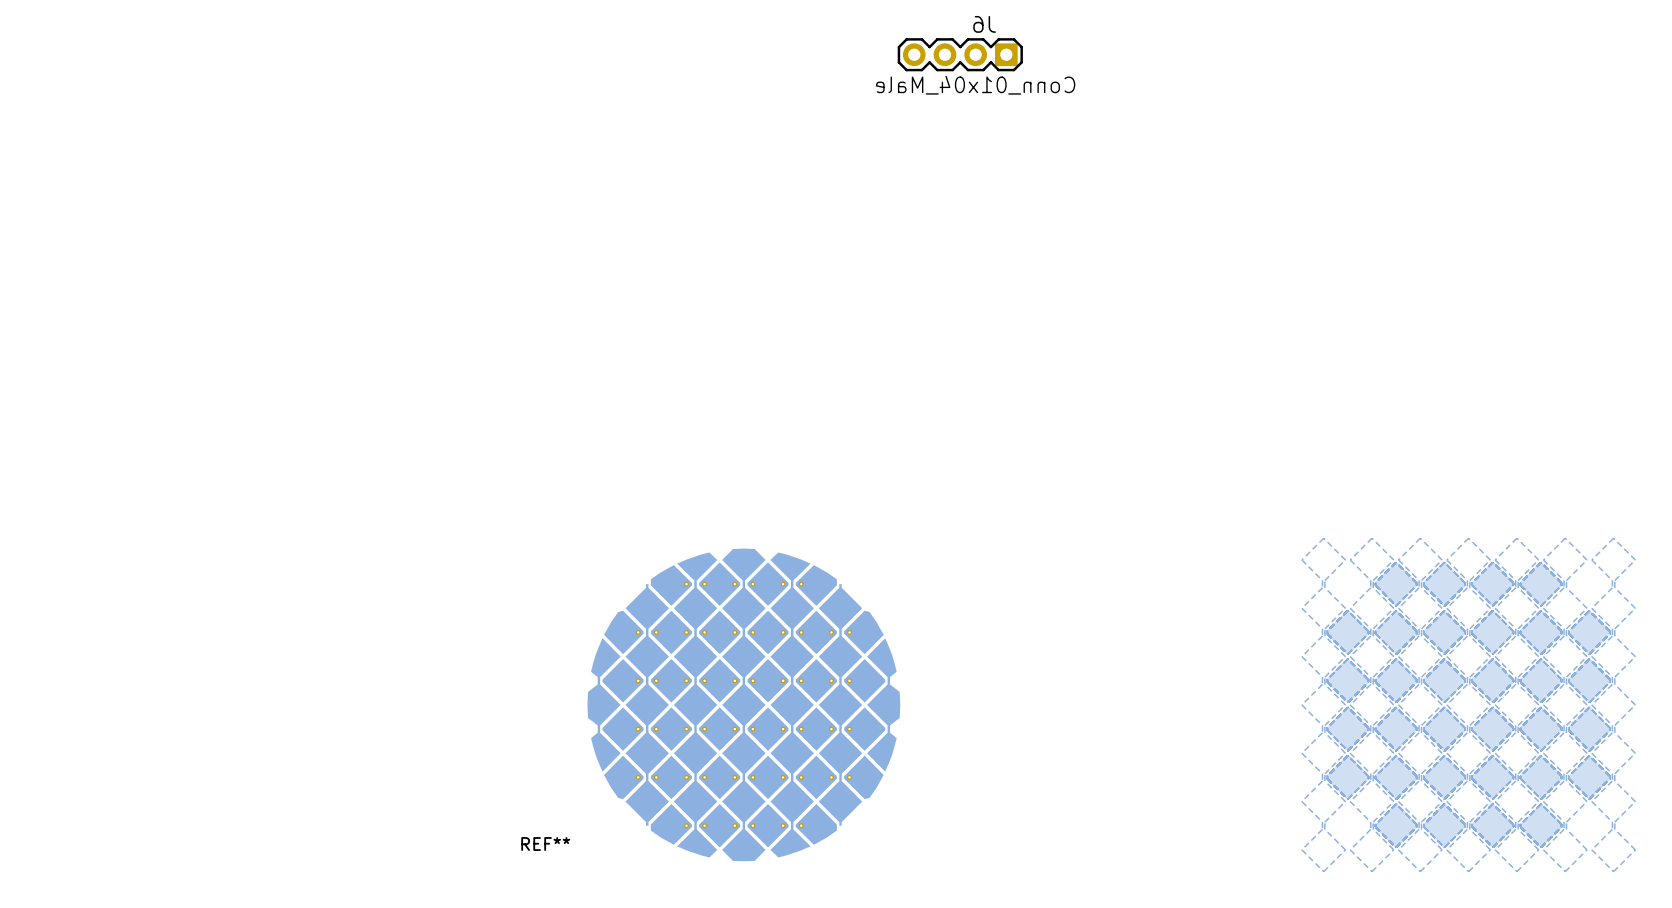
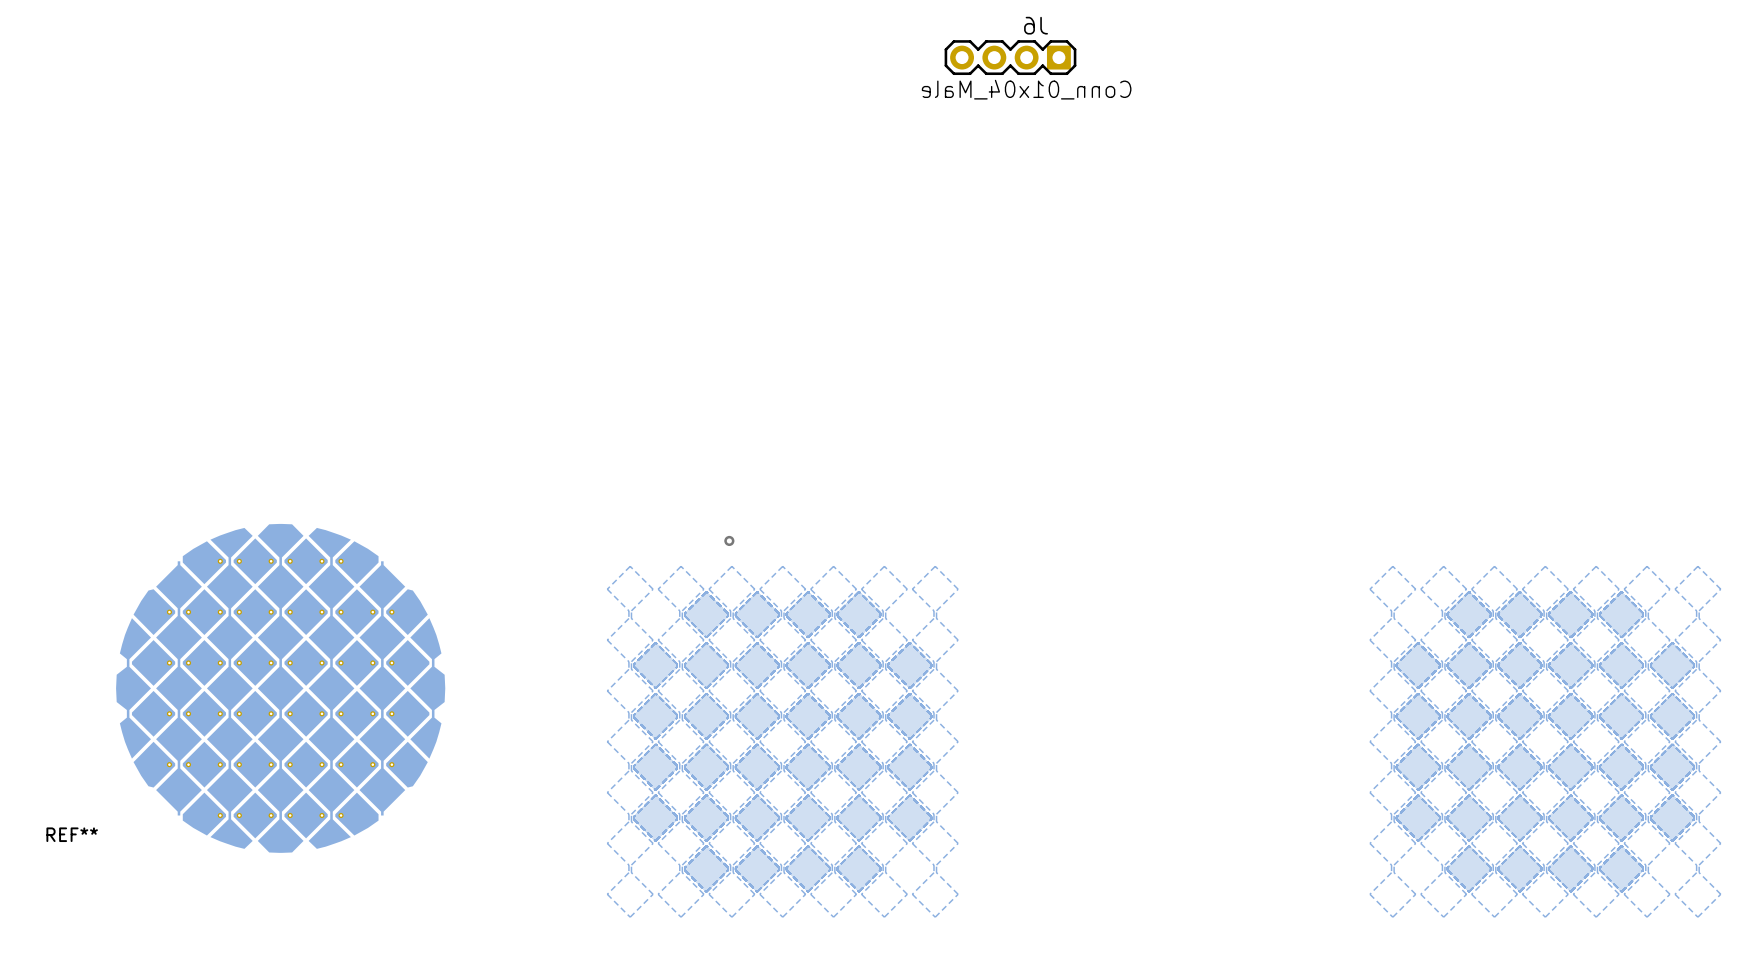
via: none -> (729, 540)
zone outline: none -> (630, 566) (653, 589) (631, 610) (631, 618) (653, 640) (631, 661) (631, 669) (653, 690) (631, 712) (631, 720) (653, 741) (631, 763) (631, 771) (653, 792) (631, 814) (631, 821) (653, 843) (631, 865) (631, 872) (653, 894) (630, 917) (607, 894) (628, 872) (628, 865) (607, 843) (628, 821) (628, 814) (607, 792) (628, 771) (628, 763) (607, 741) (628, 720) (628, 712) (607, 690) (628, 669) (628, 661) (607, 640) (628, 618) (628, 610) (607, 589) (630, 566)
zone outline: none -> (681, 566) (703, 589) (682, 610) (682, 618) (703, 640) (682, 661) (682, 669) (703, 690) (682, 712) (682, 720) (703, 741) (682, 763) (682, 771) (703, 792) (682, 814) (682, 821) (703, 843) (682, 865) (682, 872) (703, 894) (681, 917) (658, 894) (679, 872) (679, 865) (658, 843) (679, 821) (679, 814) (658, 792) (679, 771) (679, 763) (658, 741) (679, 720) (679, 712) (658, 690) (679, 669) (679, 661) (658, 640) (679, 618) (679, 610) (658, 589) (681, 566)
zone outline: none -> (731, 566) (754, 589) (733, 610) (733, 618) (754, 640) (733, 661) (733, 669) (754, 690) (733, 712) (733, 720) (754, 741) (733, 763) (733, 771) (754, 792) (733, 814) (733, 821) (754, 843) (733, 865) (733, 872) (754, 894) (731, 917) (709, 894) (730, 872) (730, 865) (709, 843) (730, 821) (730, 814) (709, 792) (730, 771) (730, 763) (709, 741) (730, 720) (730, 712) (709, 690) (730, 669) (730, 661) (709, 640) (730, 618) (730, 610) (709, 589) (731, 566)
zone outline: none -> (782, 566) (805, 589) (784, 610) (784, 618) (805, 640) (784, 661) (784, 669) (805, 690) (784, 712) (784, 720) (805, 741) (784, 763) (784, 771) (805, 792) (784, 814) (784, 821) (805, 843) (784, 865) (784, 872) (805, 894) (782, 917) (759, 894) (781, 872) (781, 865) (759, 843) (781, 821) (781, 814) (759, 792) (781, 771) (781, 763) (759, 741) (781, 720) (781, 712) (759, 690) (781, 669) (781, 661) (759, 640) (781, 618) (781, 610) (759, 589) (782, 566)
zone outline: none -> (833, 566) (856, 589) (834, 610) (834, 618) (856, 640) (834, 661) (834, 669) (856, 690) (834, 712) (834, 720) (856, 741) (834, 763) (834, 771) (856, 792) (834, 814) (834, 821) (856, 843) (834, 865) (834, 872) (856, 894) (833, 917) (810, 894) (832, 872) (832, 865) (810, 843) (832, 821) (832, 814) (810, 792) (832, 771) (832, 763) (810, 741) (832, 720) (832, 712) (810, 690) (832, 669) (832, 661) (810, 640) (832, 618) (832, 610) (810, 589) (833, 566)
zone outline: none -> (884, 566) (861, 589) (883, 610) (883, 618) (861, 640) (883, 661) (883, 669) (861, 690) (883, 712) (883, 720) (861, 741) (883, 763) (883, 771) (861, 792) (883, 814) (883, 821) (861, 843) (883, 865) (883, 872) (861, 894) (884, 917) (907, 894) (885, 872) (885, 865) (907, 843) (885, 821) (885, 814) (907, 792) (885, 771) (885, 763) (907, 741) (885, 720) (885, 712) (907, 690) (885, 669) (885, 661) (907, 640) (885, 618) (885, 610) (907, 589) (884, 566)
zone outline: none -> (935, 566) (912, 589) (933, 610) (933, 618) (912, 640) (933, 661) (933, 669) (912, 690) (933, 712) (933, 720) (912, 741) (933, 763) (933, 771) (912, 792) (933, 814) (933, 821) (912, 843) (933, 865) (933, 872) (912, 894) (935, 917) (958, 894) (936, 872) (936, 865) (958, 843) (936, 821) (936, 814) (958, 792) (936, 771) (936, 763) (958, 741) (936, 720) (936, 712) (958, 690) (936, 669) (936, 661) (958, 640) (936, 618) (936, 610) (958, 589) (935, 566)
zone outline: none -> (706, 591) (728, 613) (728, 615) (706, 637) (684, 615) (684, 613) (706, 591)
zone outline: none -> (757, 591) (778, 613) (778, 615) (757, 637) (735, 615) (735, 613) (757, 591)
zone outline: none -> (808, 591) (829, 613) (829, 615) (808, 637) (786, 615) (786, 613) (808, 591)
zone outline: none -> (859, 591) (880, 613) (880, 615) (859, 637) (837, 615) (837, 613) (859, 591)
zone outline: none -> (655, 642) (677, 664) (677, 666) (655, 688) (634, 666) (634, 664) (655, 642)
zone outline: none -> (706, 642) (728, 664) (728, 666) (706, 688) (684, 666) (684, 664) (706, 642)
zone outline: none -> (757, 642) (778, 664) (778, 666) (757, 688) (735, 666) (735, 664) (757, 642)
zone outline: none -> (808, 642) (829, 664) (829, 666) (808, 688) (786, 666) (786, 664) (808, 642)
zone outline: none -> (859, 642) (880, 664) (880, 666) (859, 688) (837, 666) (837, 664) (859, 642)
zone outline: none -> (909, 642) (888, 664) (888, 666) (909, 688) (931, 666) (931, 664) (909, 642)
REF**: none -> (280, 688)
zone outline: none -> (655, 693) (677, 715) (677, 717) (655, 739) (634, 717) (634, 715) (655, 693)
zone outline: none -> (706, 693) (684, 715) (684, 717) (706, 739) (728, 717) (728, 715) (706, 693)
zone outline: none -> (757, 693) (778, 715) (778, 717) (757, 739) (735, 717) (735, 715) (757, 693)
zone outline: none -> (808, 693) (829, 715) (829, 717) (808, 739) (786, 717) (786, 715) (808, 693)
zone outline: none -> (859, 693) (837, 715) (837, 717) (859, 739) (880, 717) (880, 715) (859, 693)
zone outline: none -> (909, 693) (931, 715) (931, 717) (909, 739) (888, 717) (888, 715) (909, 693)
REF**: (743, 704) -> none
zone outline: none -> (655, 744) (634, 765) (634, 768) (655, 790) (677, 768) (677, 765) (655, 744)
zone outline: none -> (706, 744) (684, 765) (684, 768) (706, 790) (728, 768) (728, 765) (706, 744)
zone outline: none -> (757, 744) (735, 765) (735, 768) (757, 790) (778, 768) (778, 765) (757, 744)
zone outline: none -> (808, 744) (829, 765) (829, 768) (808, 790) (786, 768) (786, 765) (808, 744)
zone outline: none -> (859, 744) (837, 765) (837, 768) (859, 790) (880, 768) (880, 765) (859, 744)
zone outline: none -> (909, 744) (931, 765) (931, 768) (909, 790) (888, 768) (888, 765) (909, 744)
zone outline: none -> (655, 795) (634, 816) (634, 819) (655, 840) (677, 819) (677, 816) (655, 795)
zone outline: none -> (706, 795) (684, 816) (684, 819) (706, 840) (728, 819) (728, 816) (706, 795)
zone outline: none -> (757, 795) (735, 816) (735, 819) (757, 840) (778, 819) (778, 816) (757, 795)
zone outline: none -> (808, 795) (786, 816) (786, 819) (808, 840) (829, 819) (829, 816) (808, 795)
zone outline: none -> (859, 795) (880, 816) (880, 819) (859, 840) (837, 819) (837, 816) (859, 795)
zone outline: none -> (909, 795) (931, 816) (931, 819) (909, 840) (888, 819) (888, 816) (909, 795)
zone outline: none -> (706, 846) (684, 867) (684, 870) (706, 891) (728, 870) (728, 867) (706, 846)
zone outline: none -> (757, 846) (735, 867) (735, 870) (757, 891) (778, 870) (778, 867) (757, 846)
zone outline: none -> (808, 846) (829, 867) (829, 870) (808, 891) (786, 870) (786, 867) (808, 846)
zone outline: none -> (859, 846) (880, 867) (880, 870) (859, 891) (837, 870) (837, 867) (859, 846)

